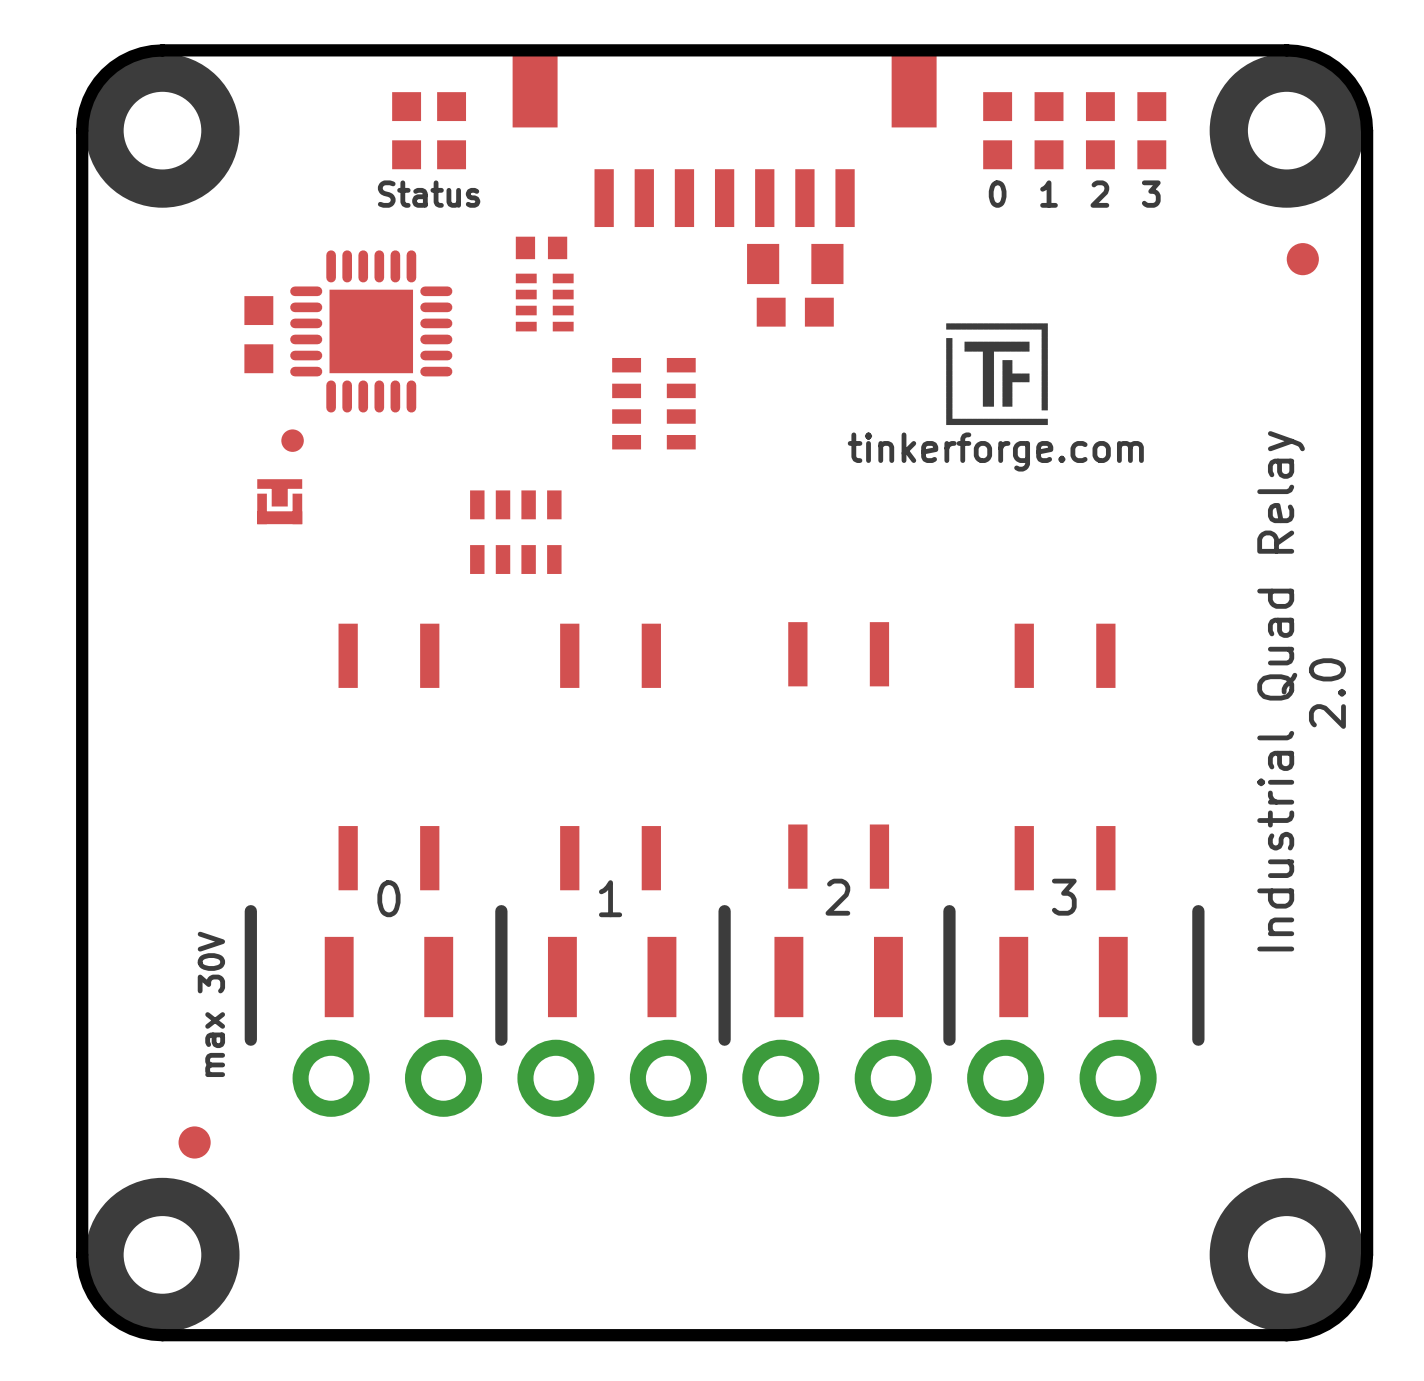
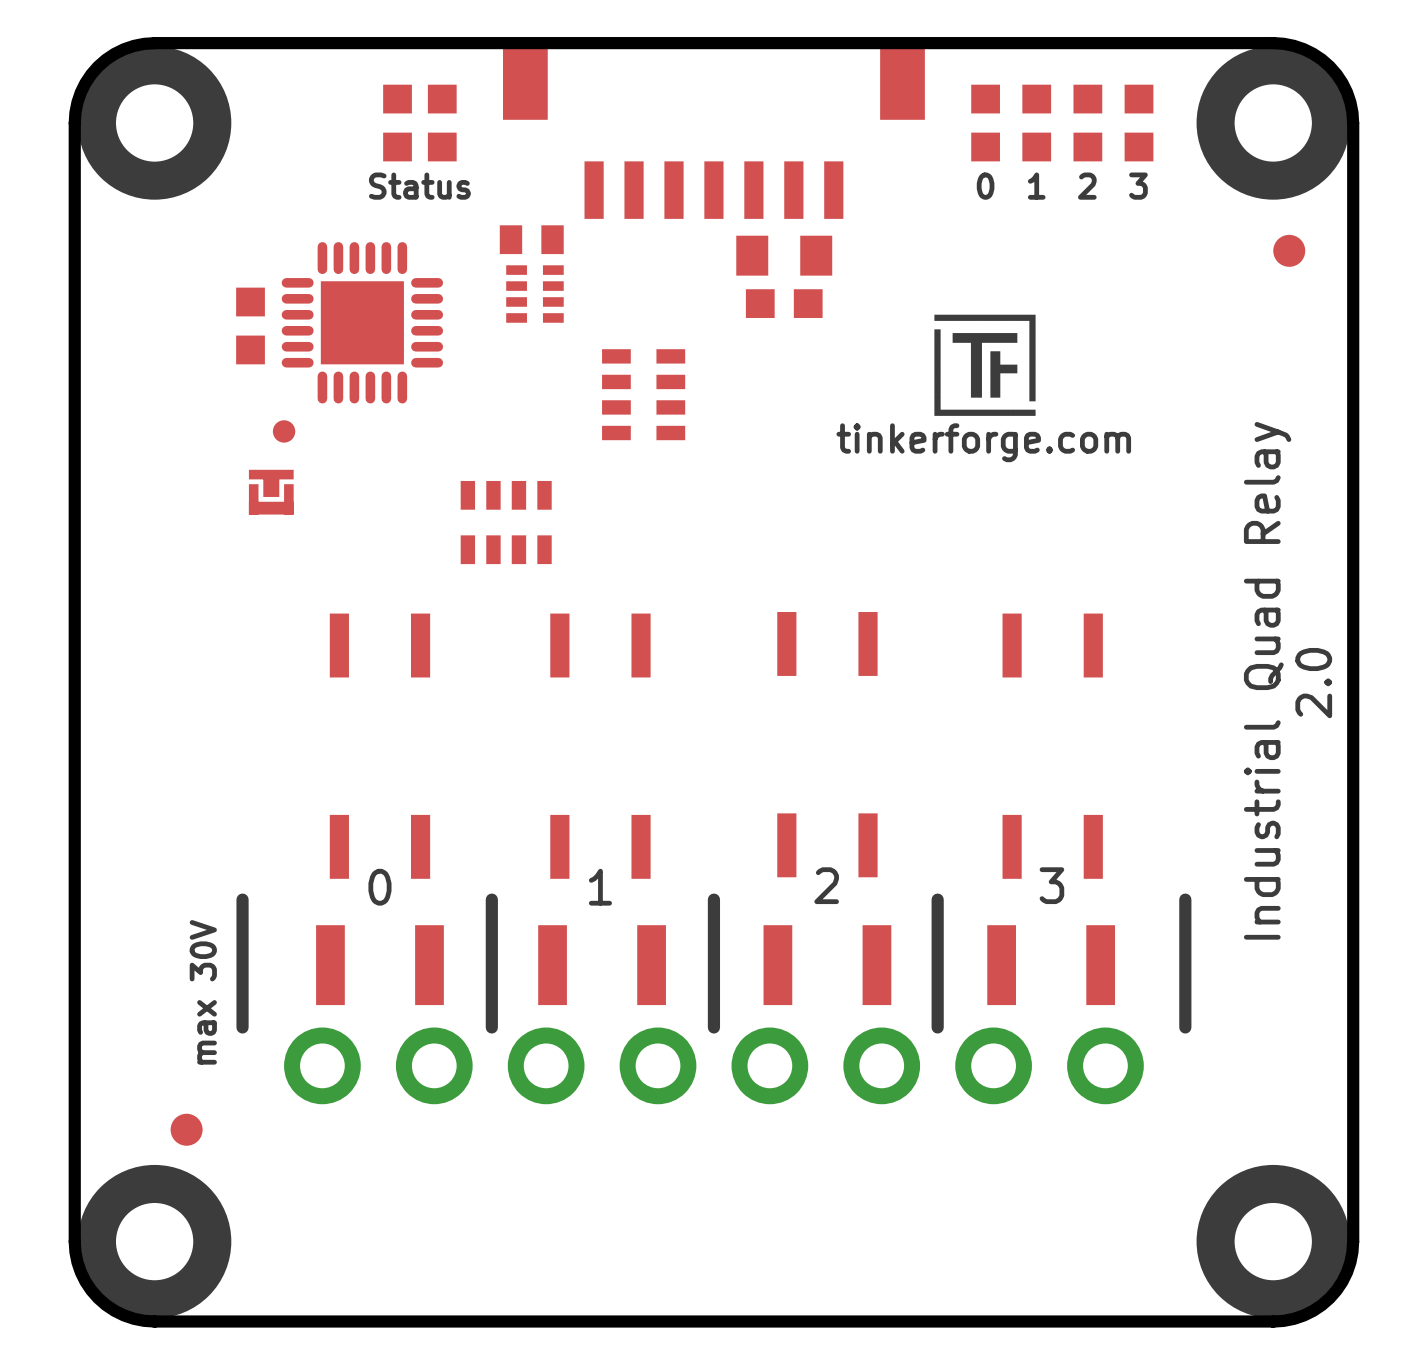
part footprint: [515, 236, 568, 260] -> [499, 225, 564, 255]

